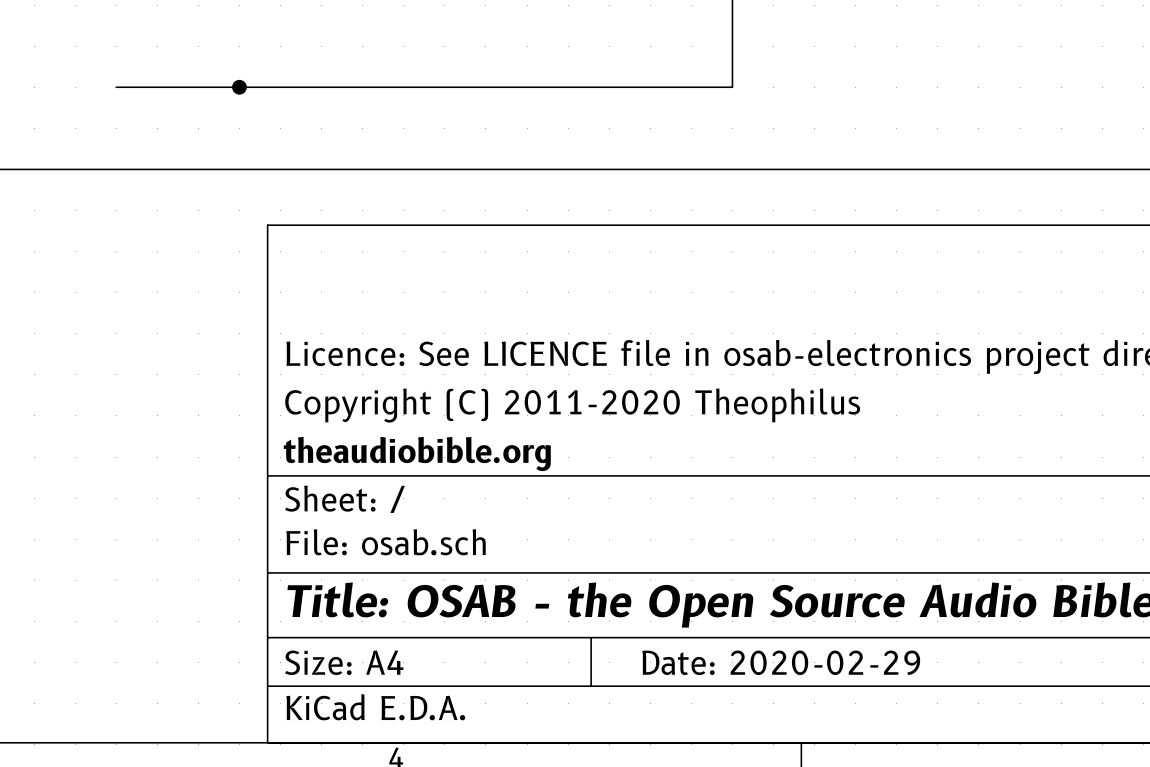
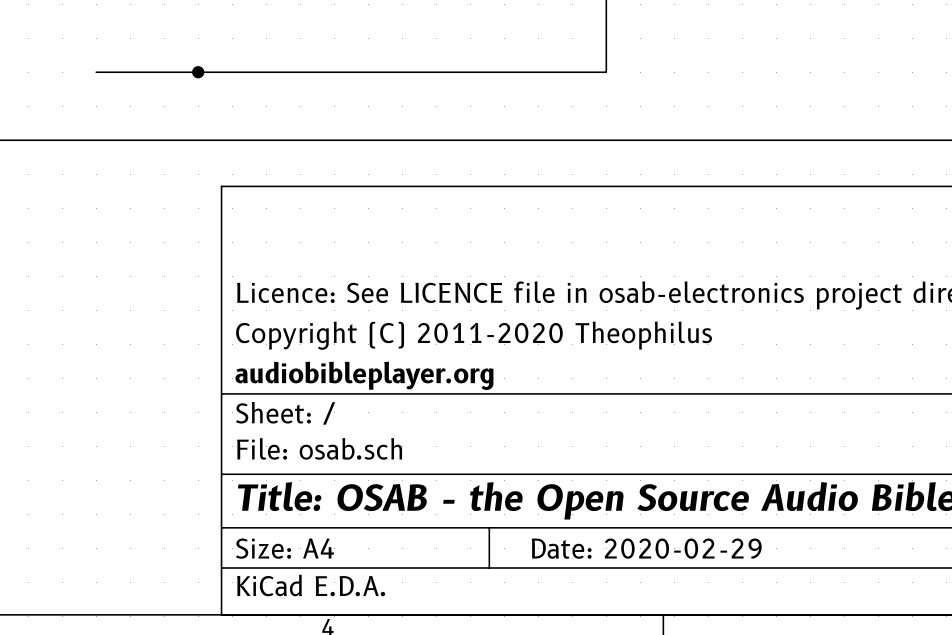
title block: theaudiobible.org (417, 454) -> audiobibleplayer.org (364, 375)

